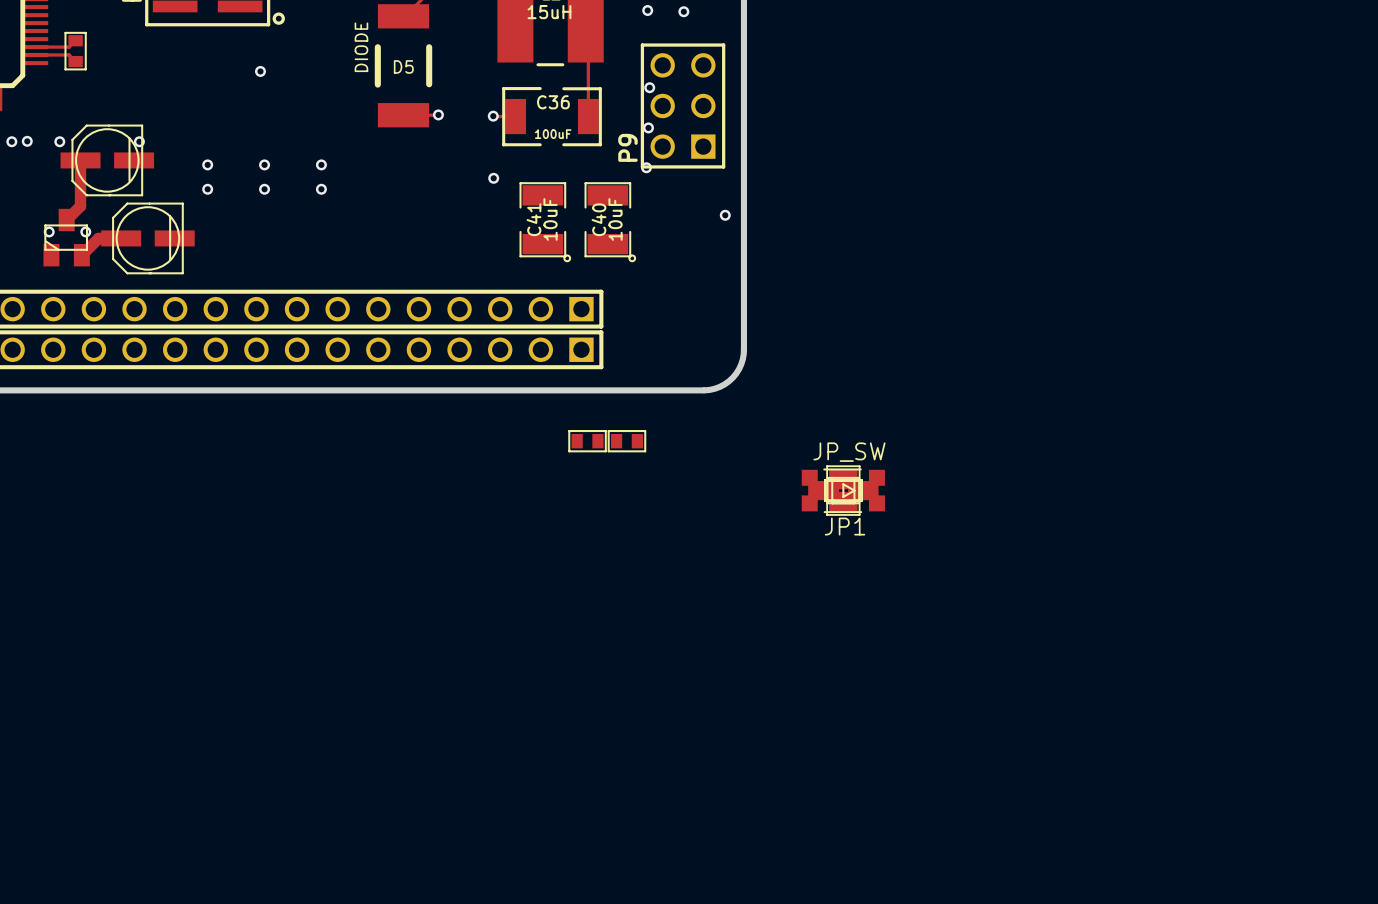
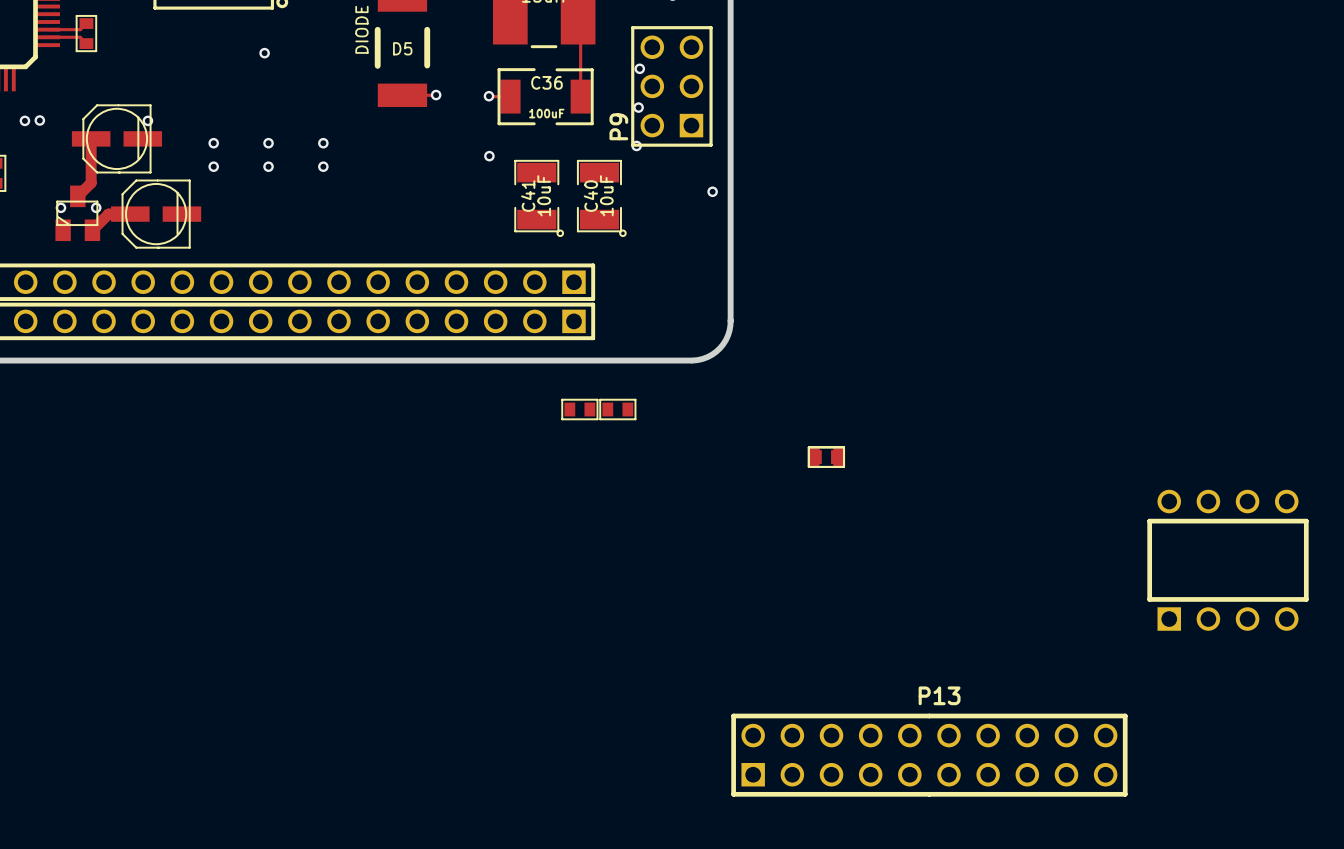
via: (59, 141) -> none
JP1: JP_SW (843, 490) -> none
part: (843, 490) -> none
part: (843, 490) -> none
part: none -> (1227, 560)
P13: none -> (929, 755)

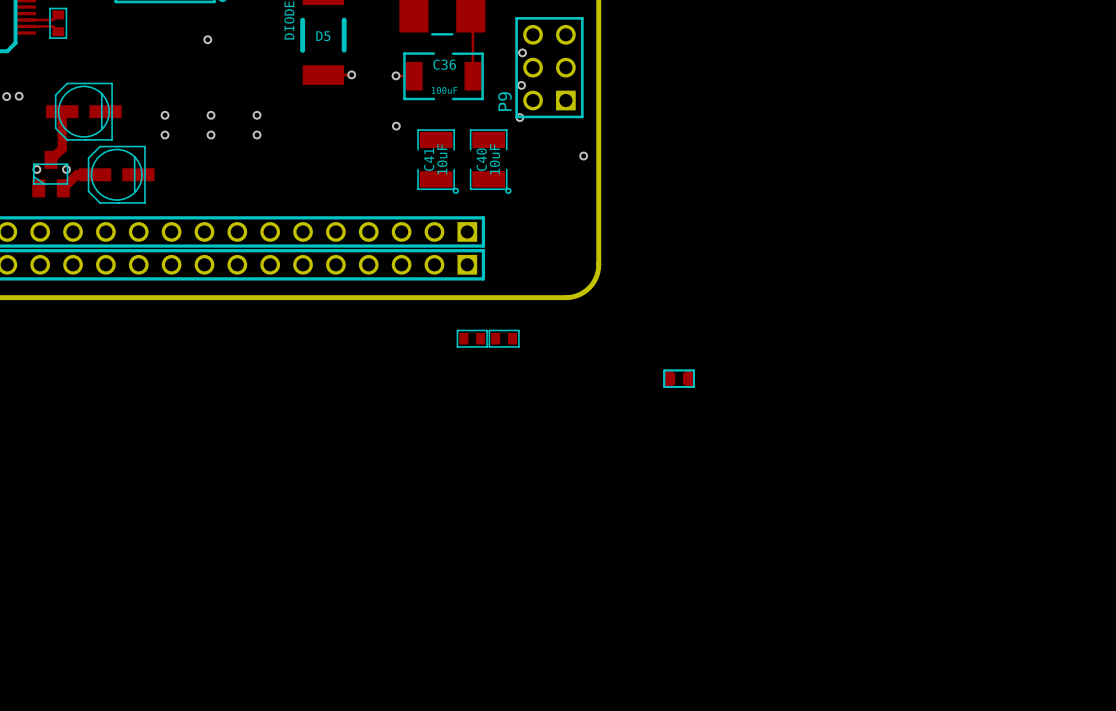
via: (147, 120) -> none
part: (1227, 560) -> none
P13: (929, 755) -> none

